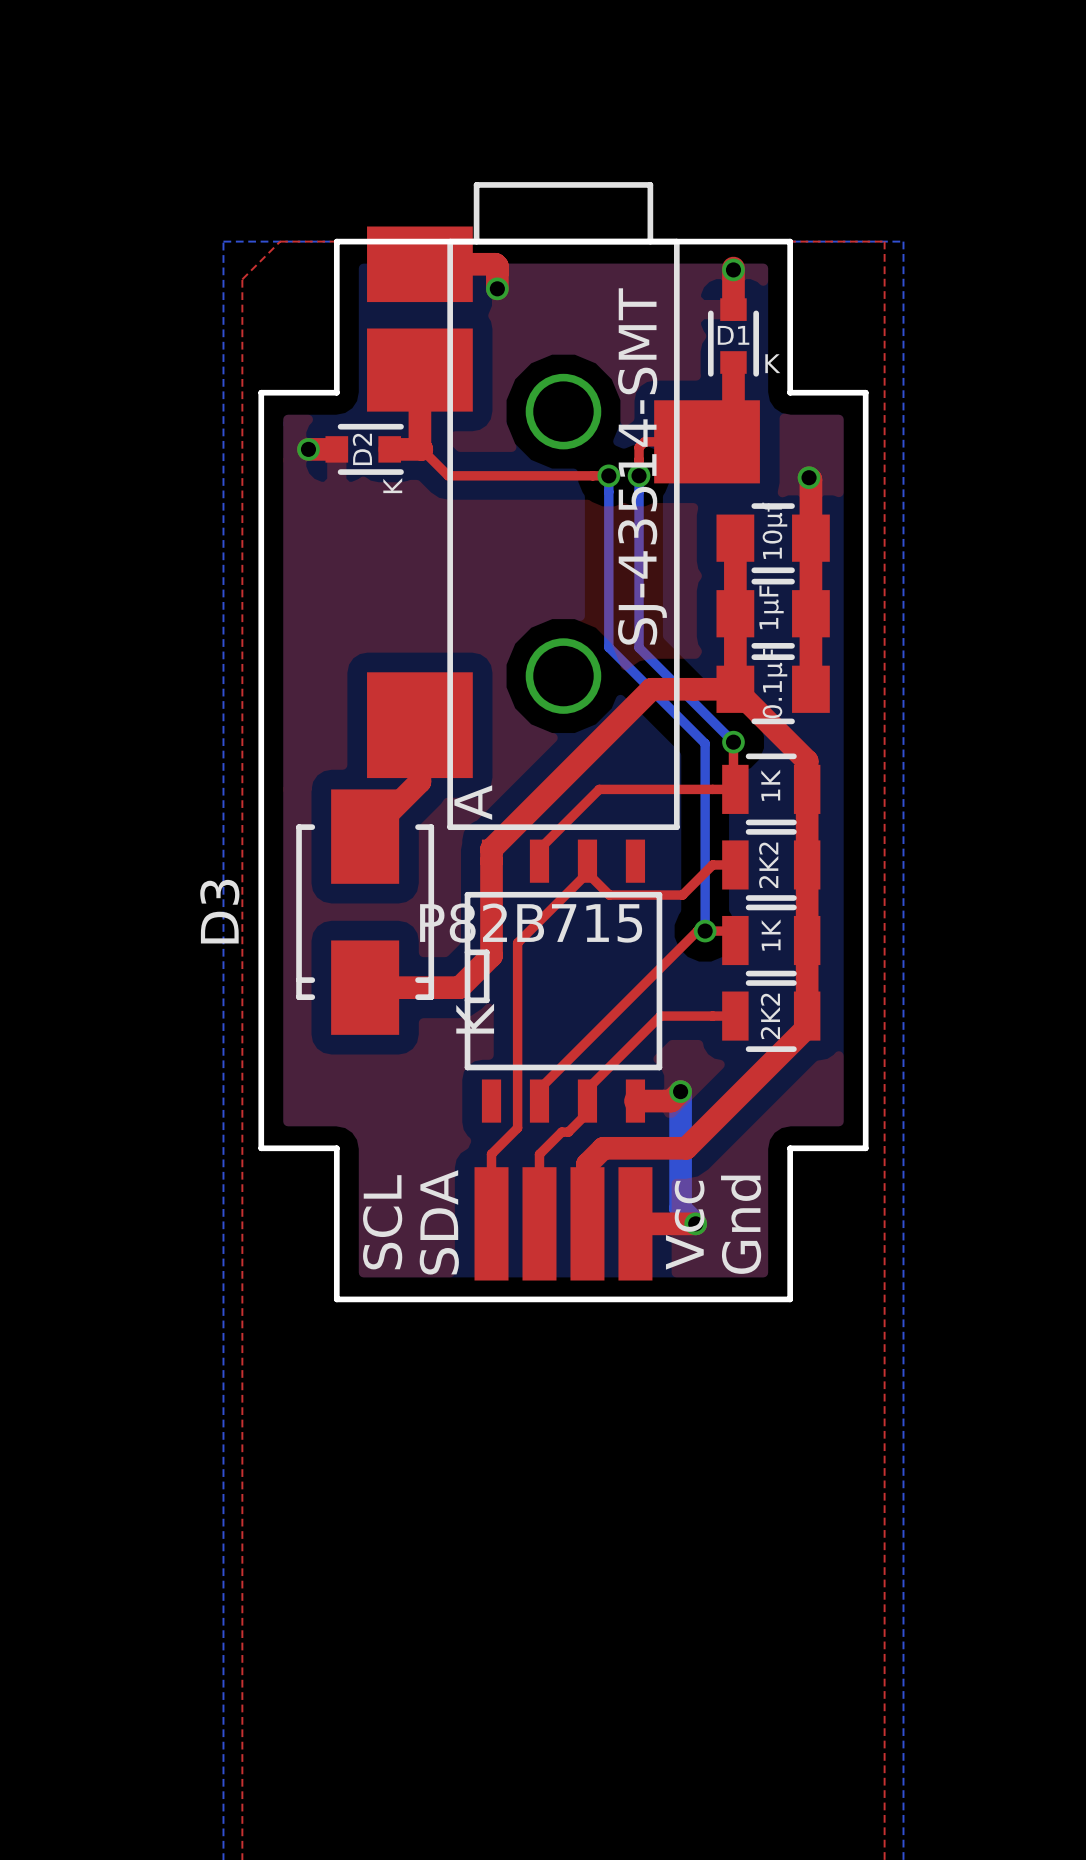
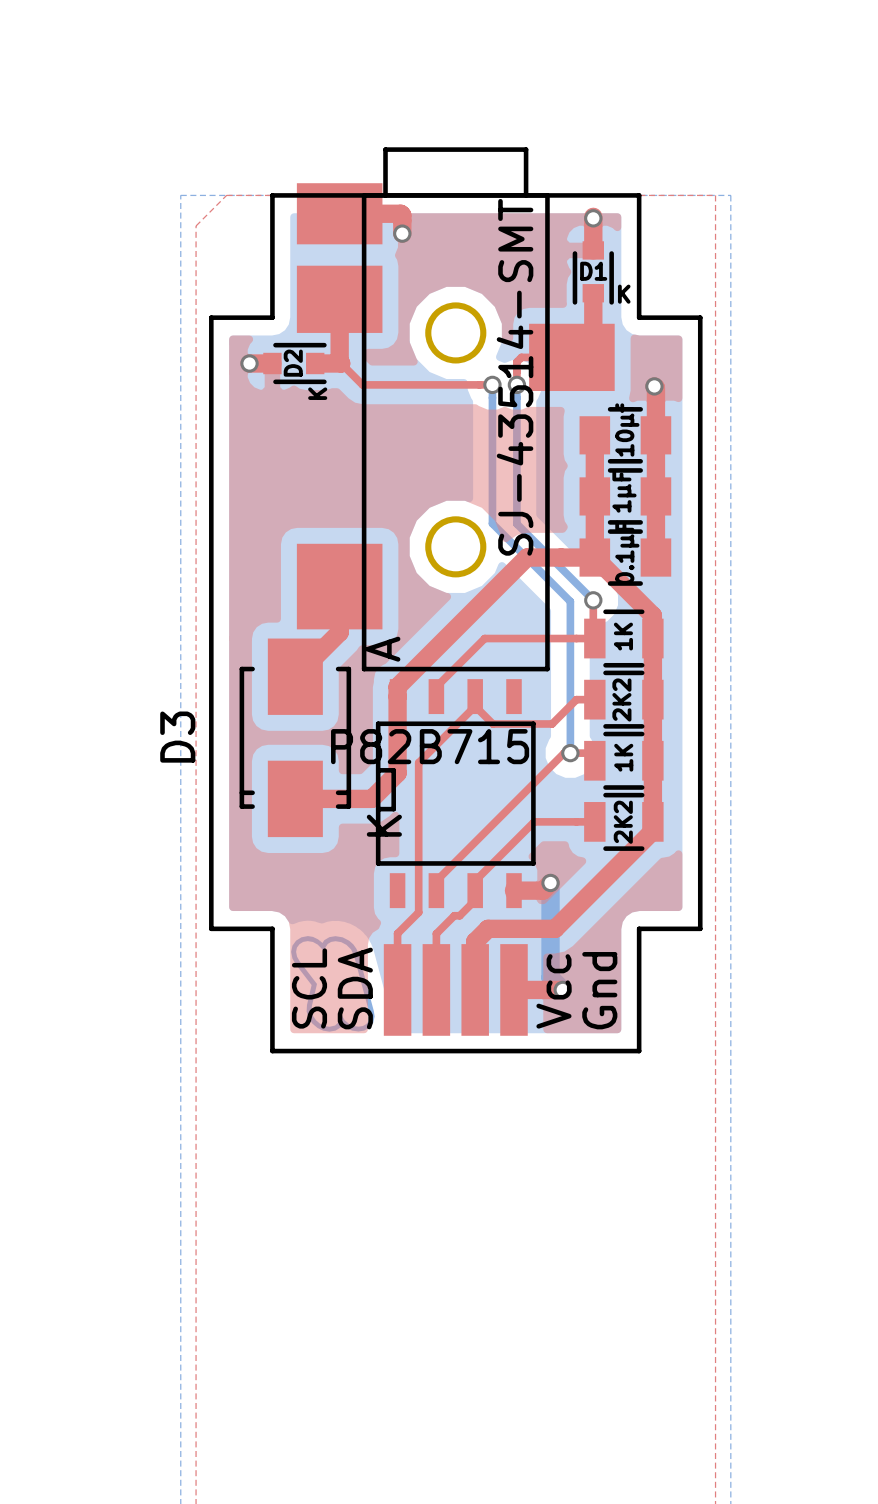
drawing: none -> [291, 936, 375, 1032]

